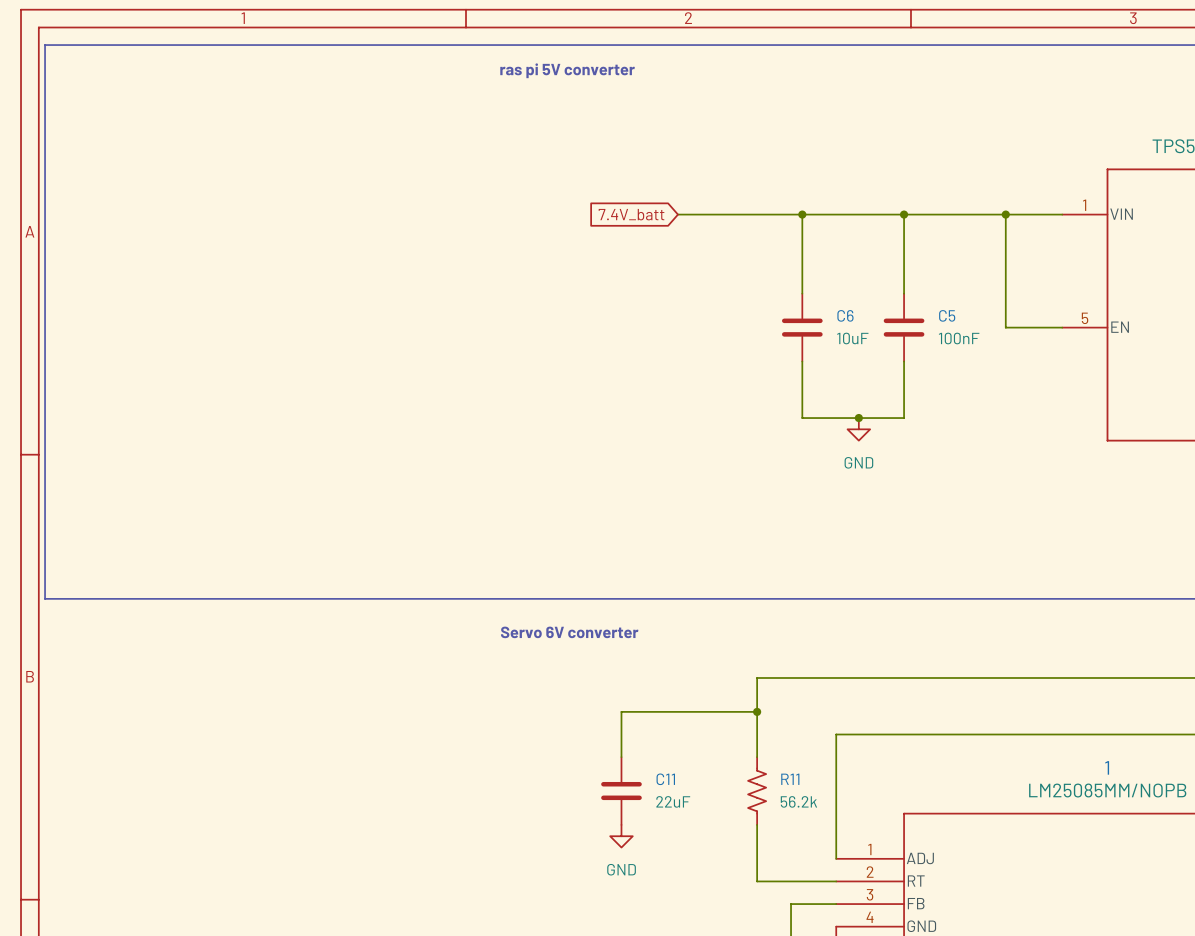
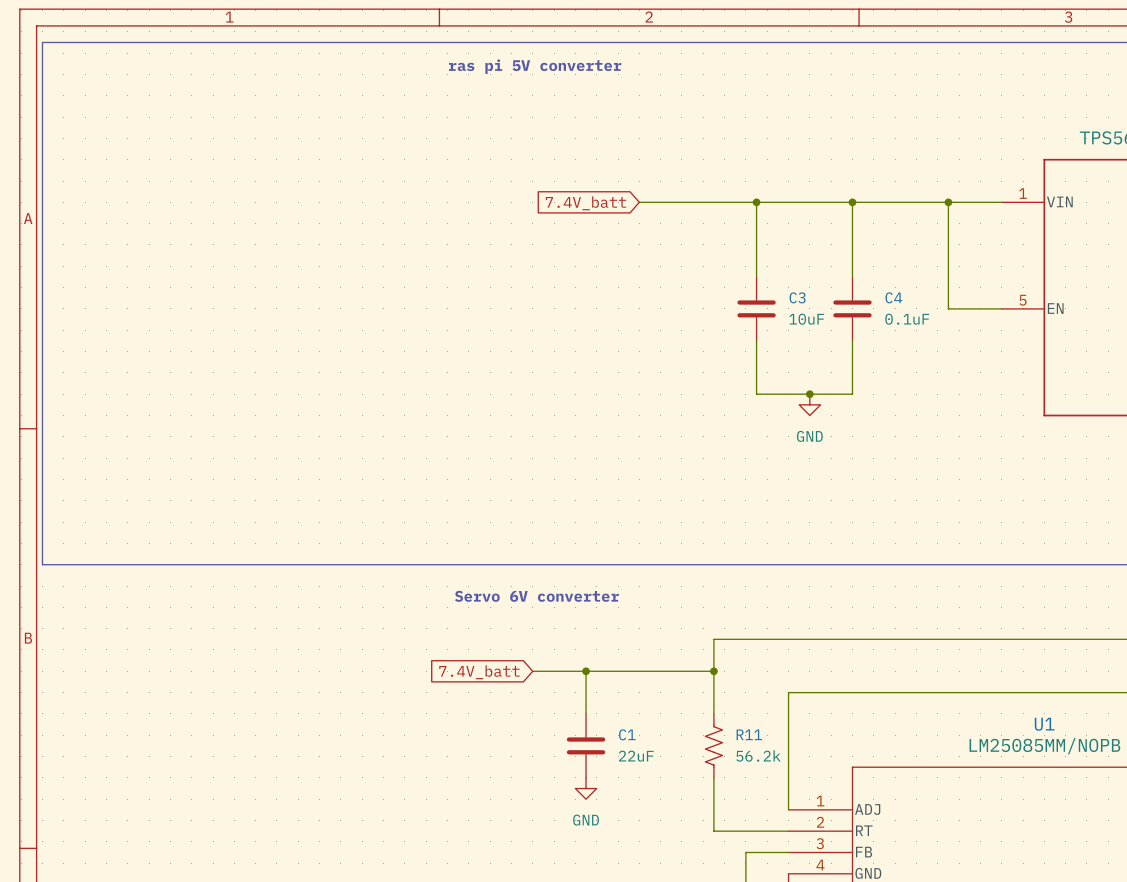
C6 name: C6 (845, 315) -> C3 (797, 297)
C5 name: C5 (947, 315) -> C4 (893, 297)
C5 value: 100nF (959, 338) -> 0.1uF (907, 319)
global label: none -> 7.4V_batt (479, 672)
wire: none -> (532, 671) (586, 671)
junction: none -> (586, 671)
1 name: 1 (1107, 767) -> U1 (1044, 724)
C11 name: C11 (665, 779) -> C1 (627, 734)

